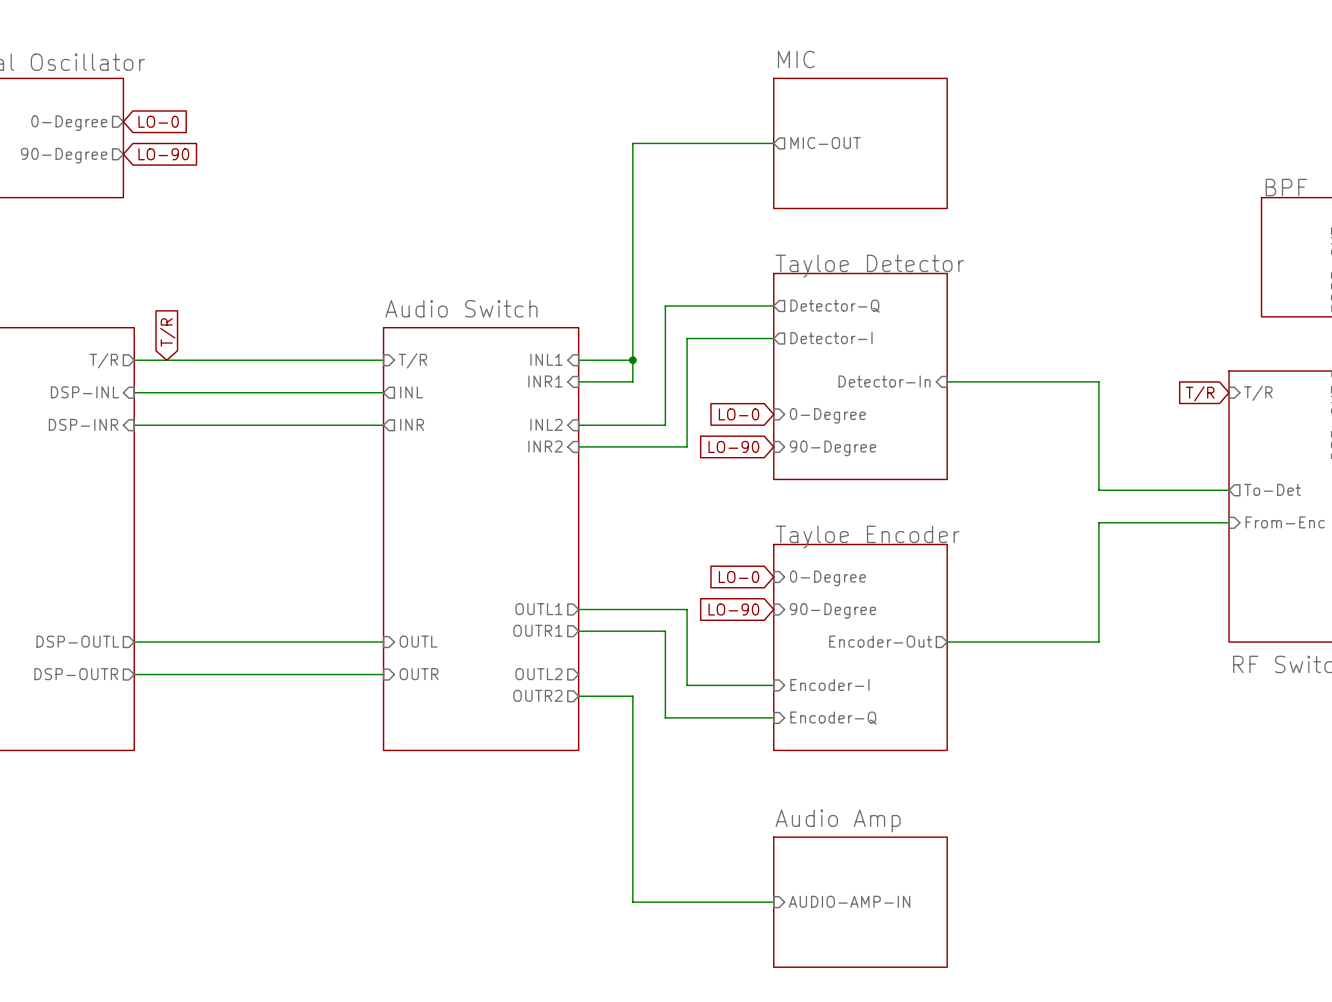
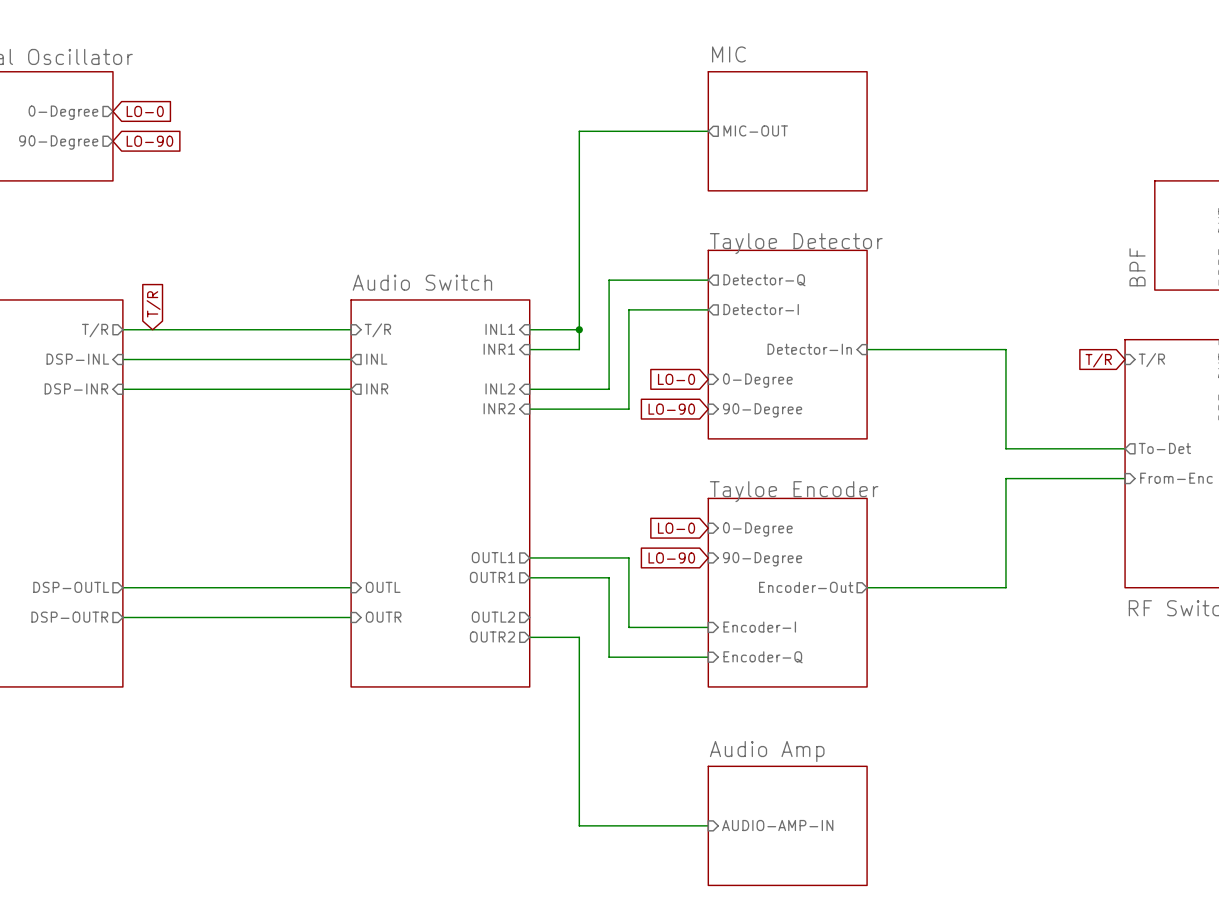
sheet BPF name rotation: 0° (1286, 187) -> 90° counterclockwise (1137, 267)
sheet BPF name position: BPF (1286, 187) -> BPF (1137, 267)

